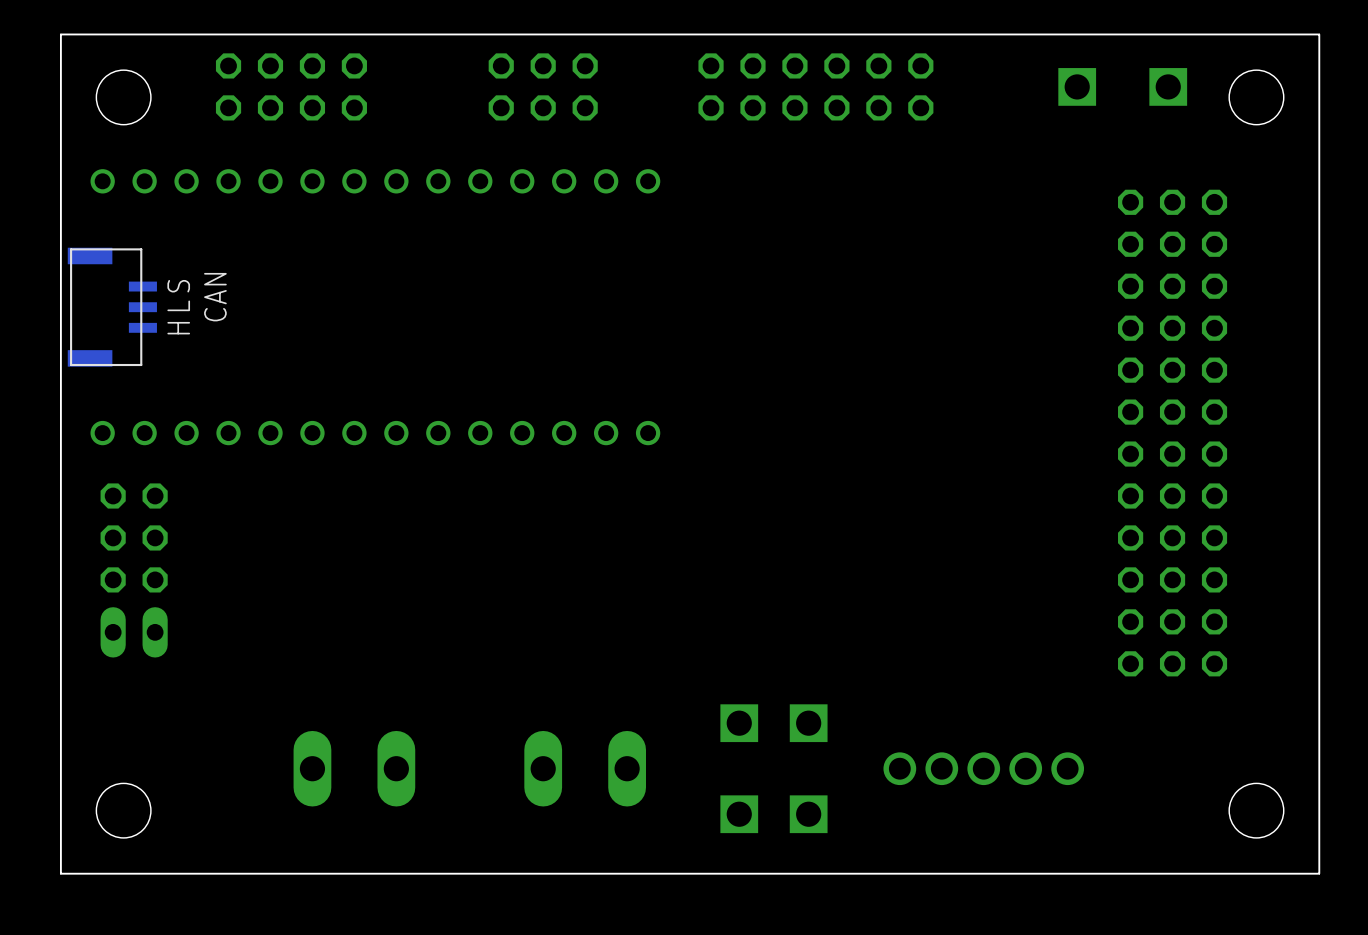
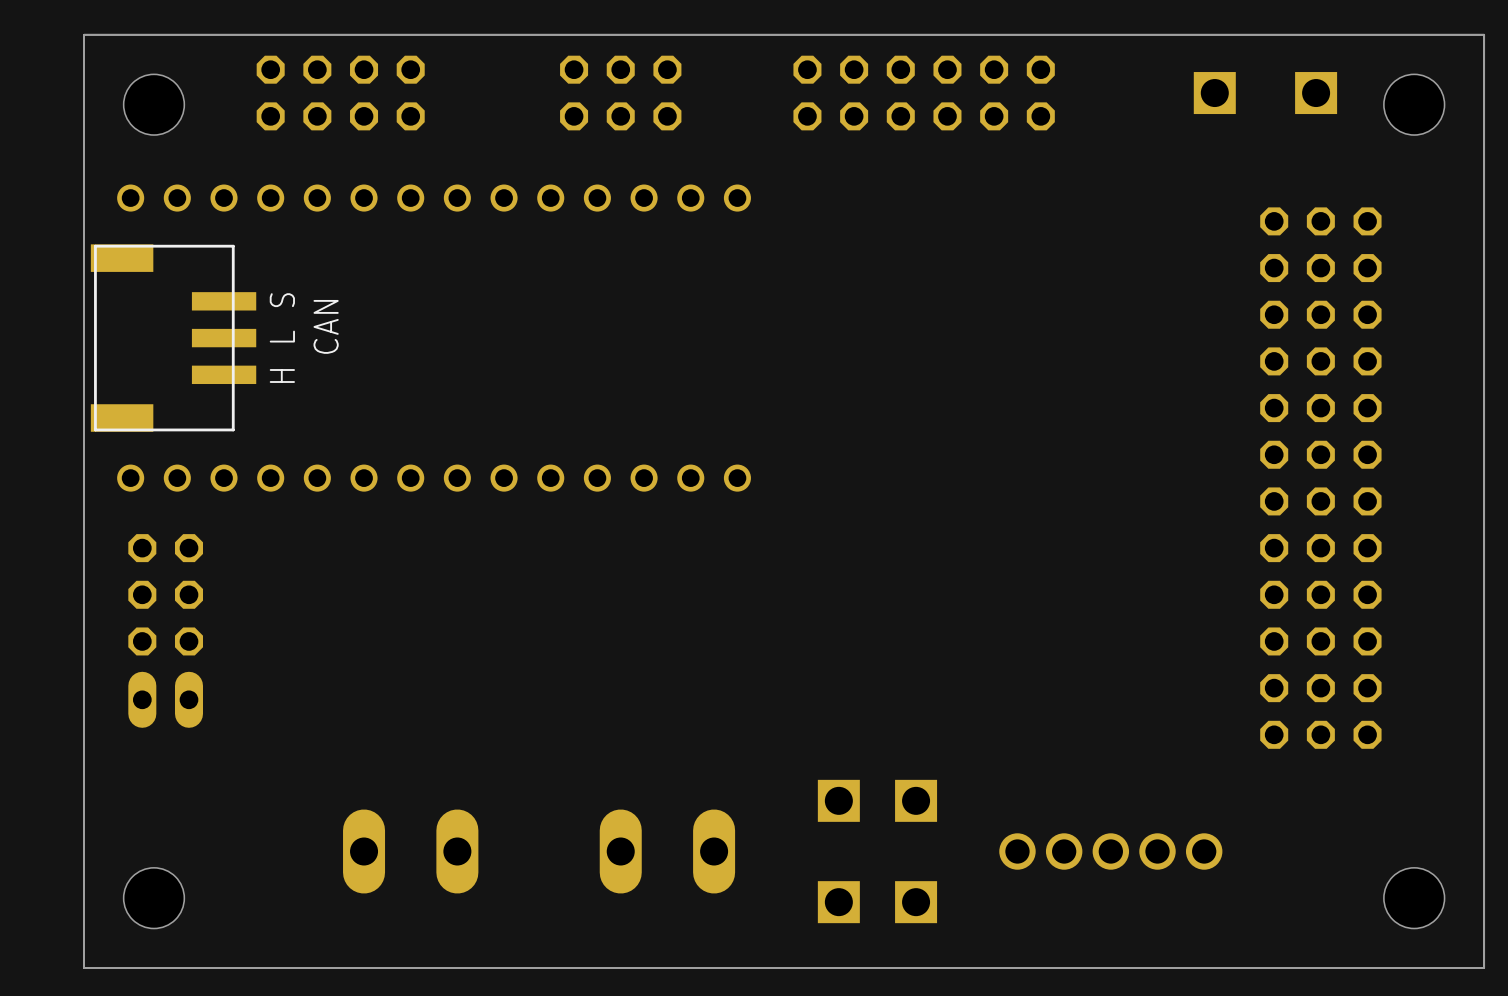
text position: S (178, 286) -> S (282, 300)
text position: CAN (215, 297) -> CAN (326, 326)
text position: L (178, 305) -> L (282, 336)
part: (112, 307) -> none
part: none -> (173, 338)
text position: H (178, 328) -> H (282, 376)

